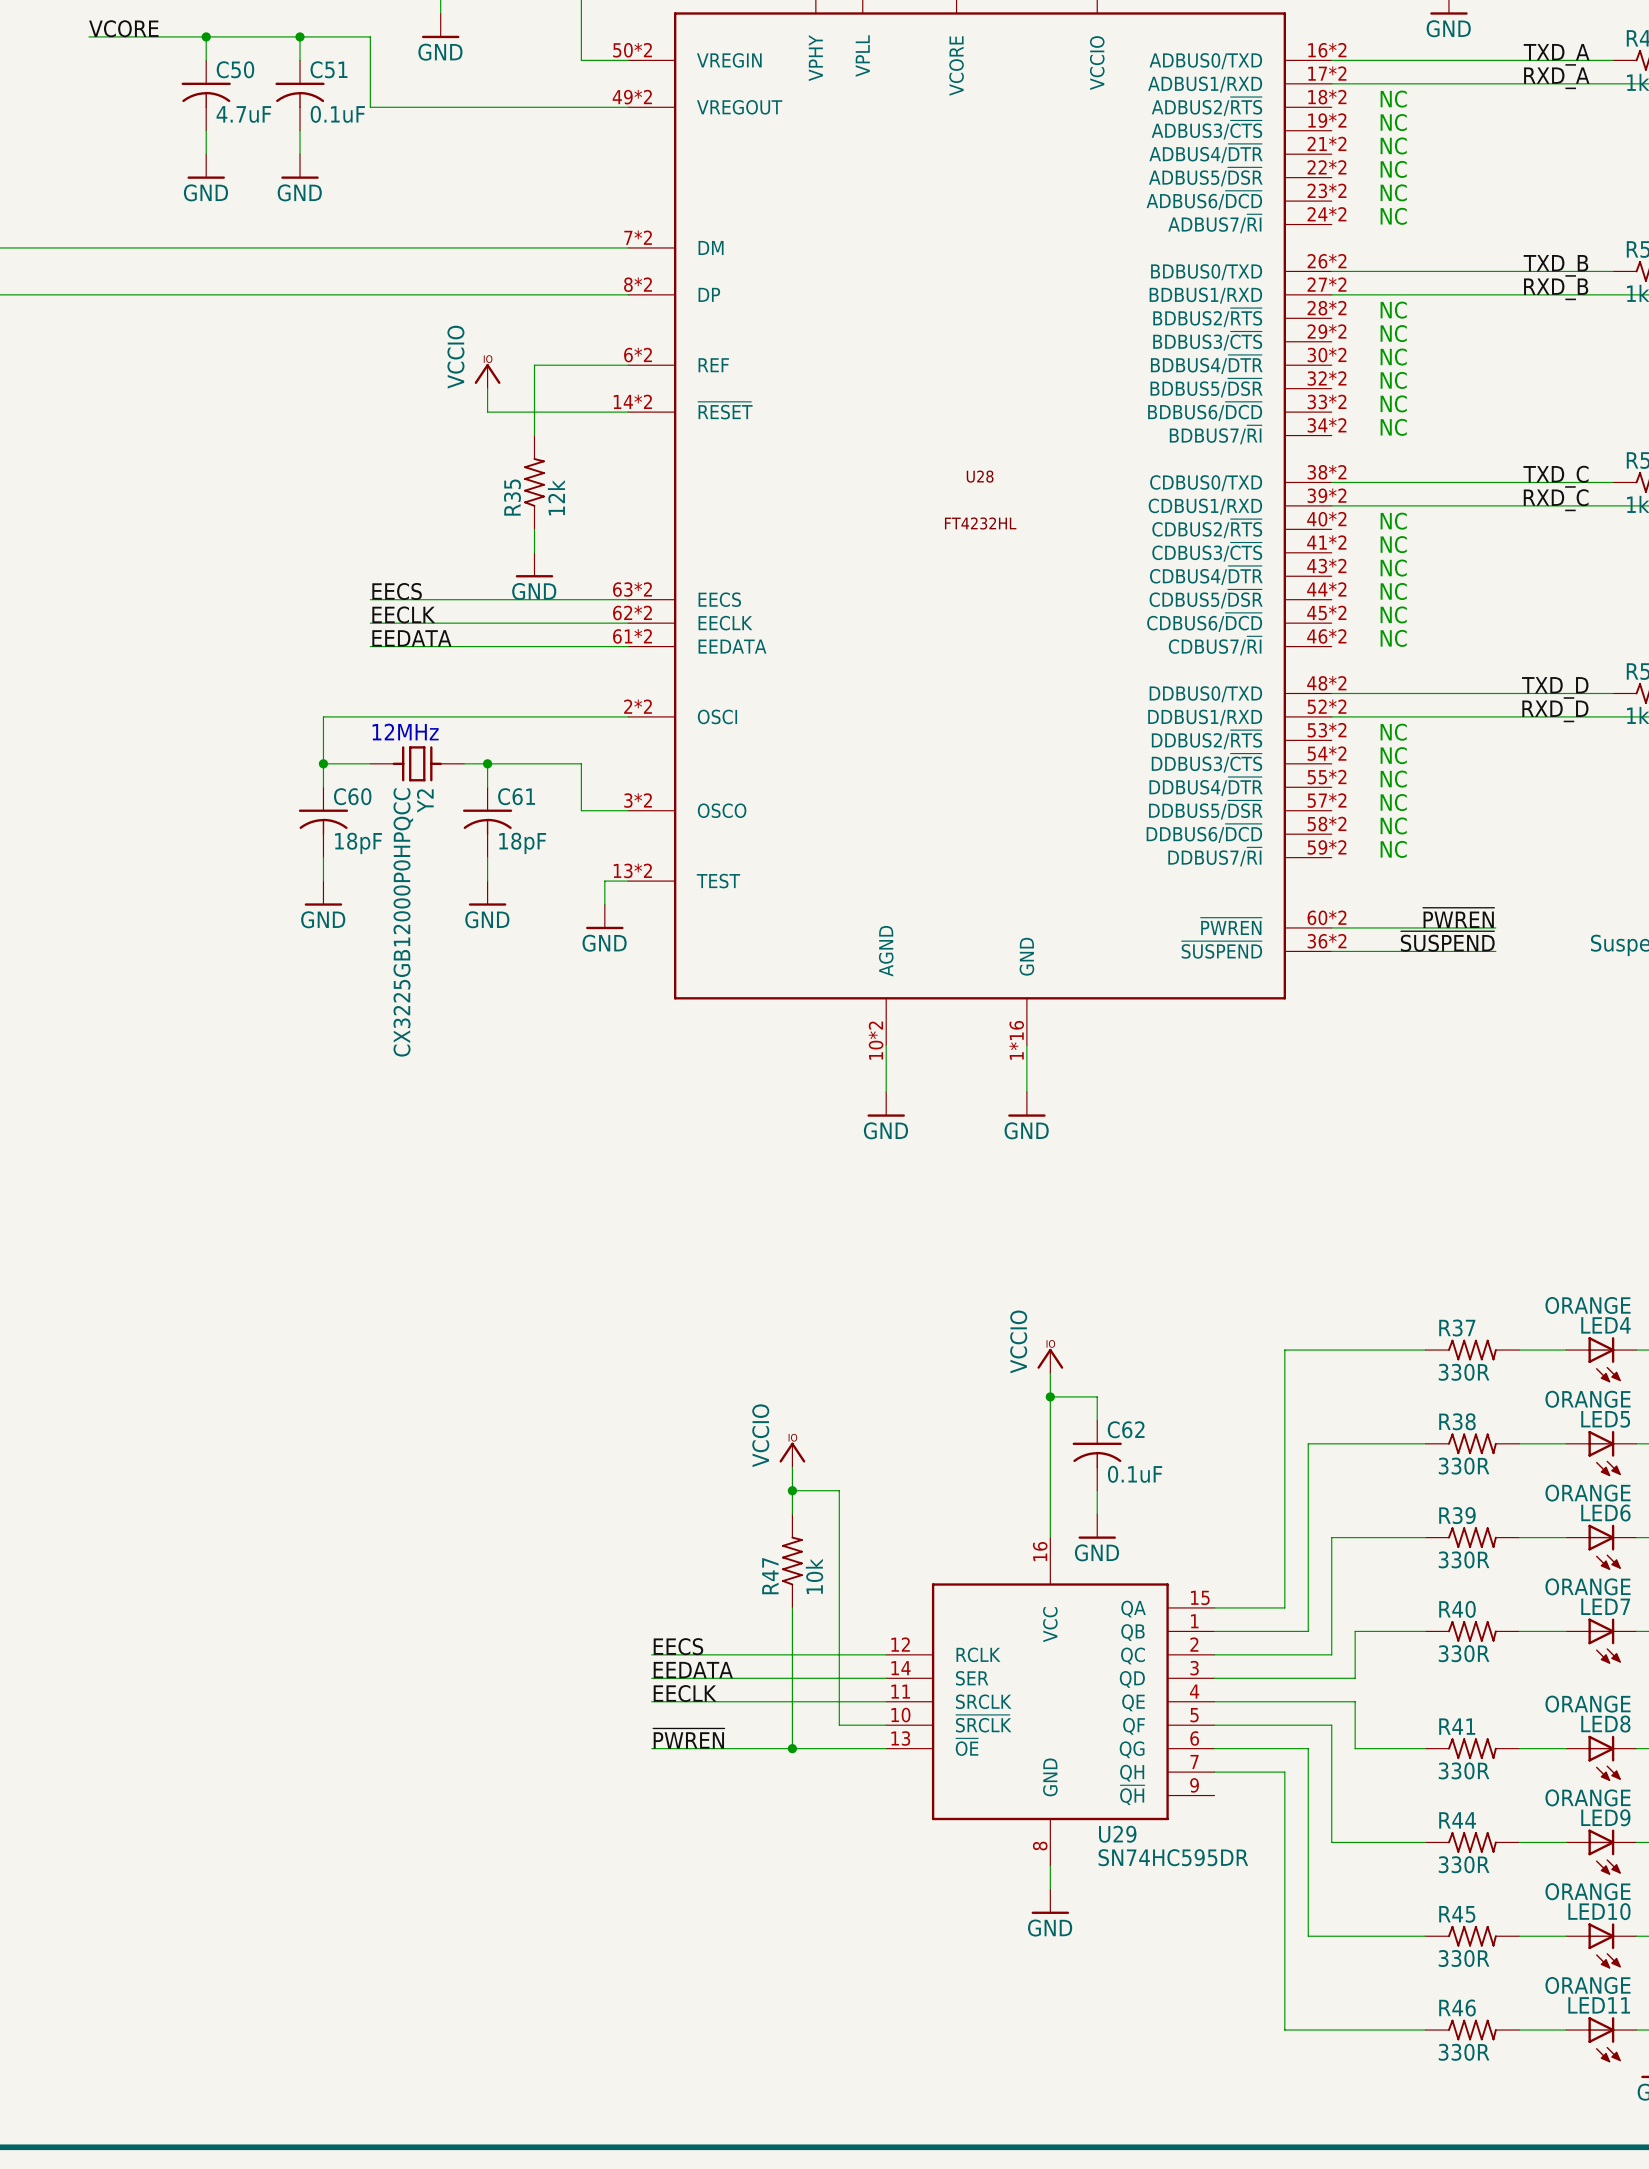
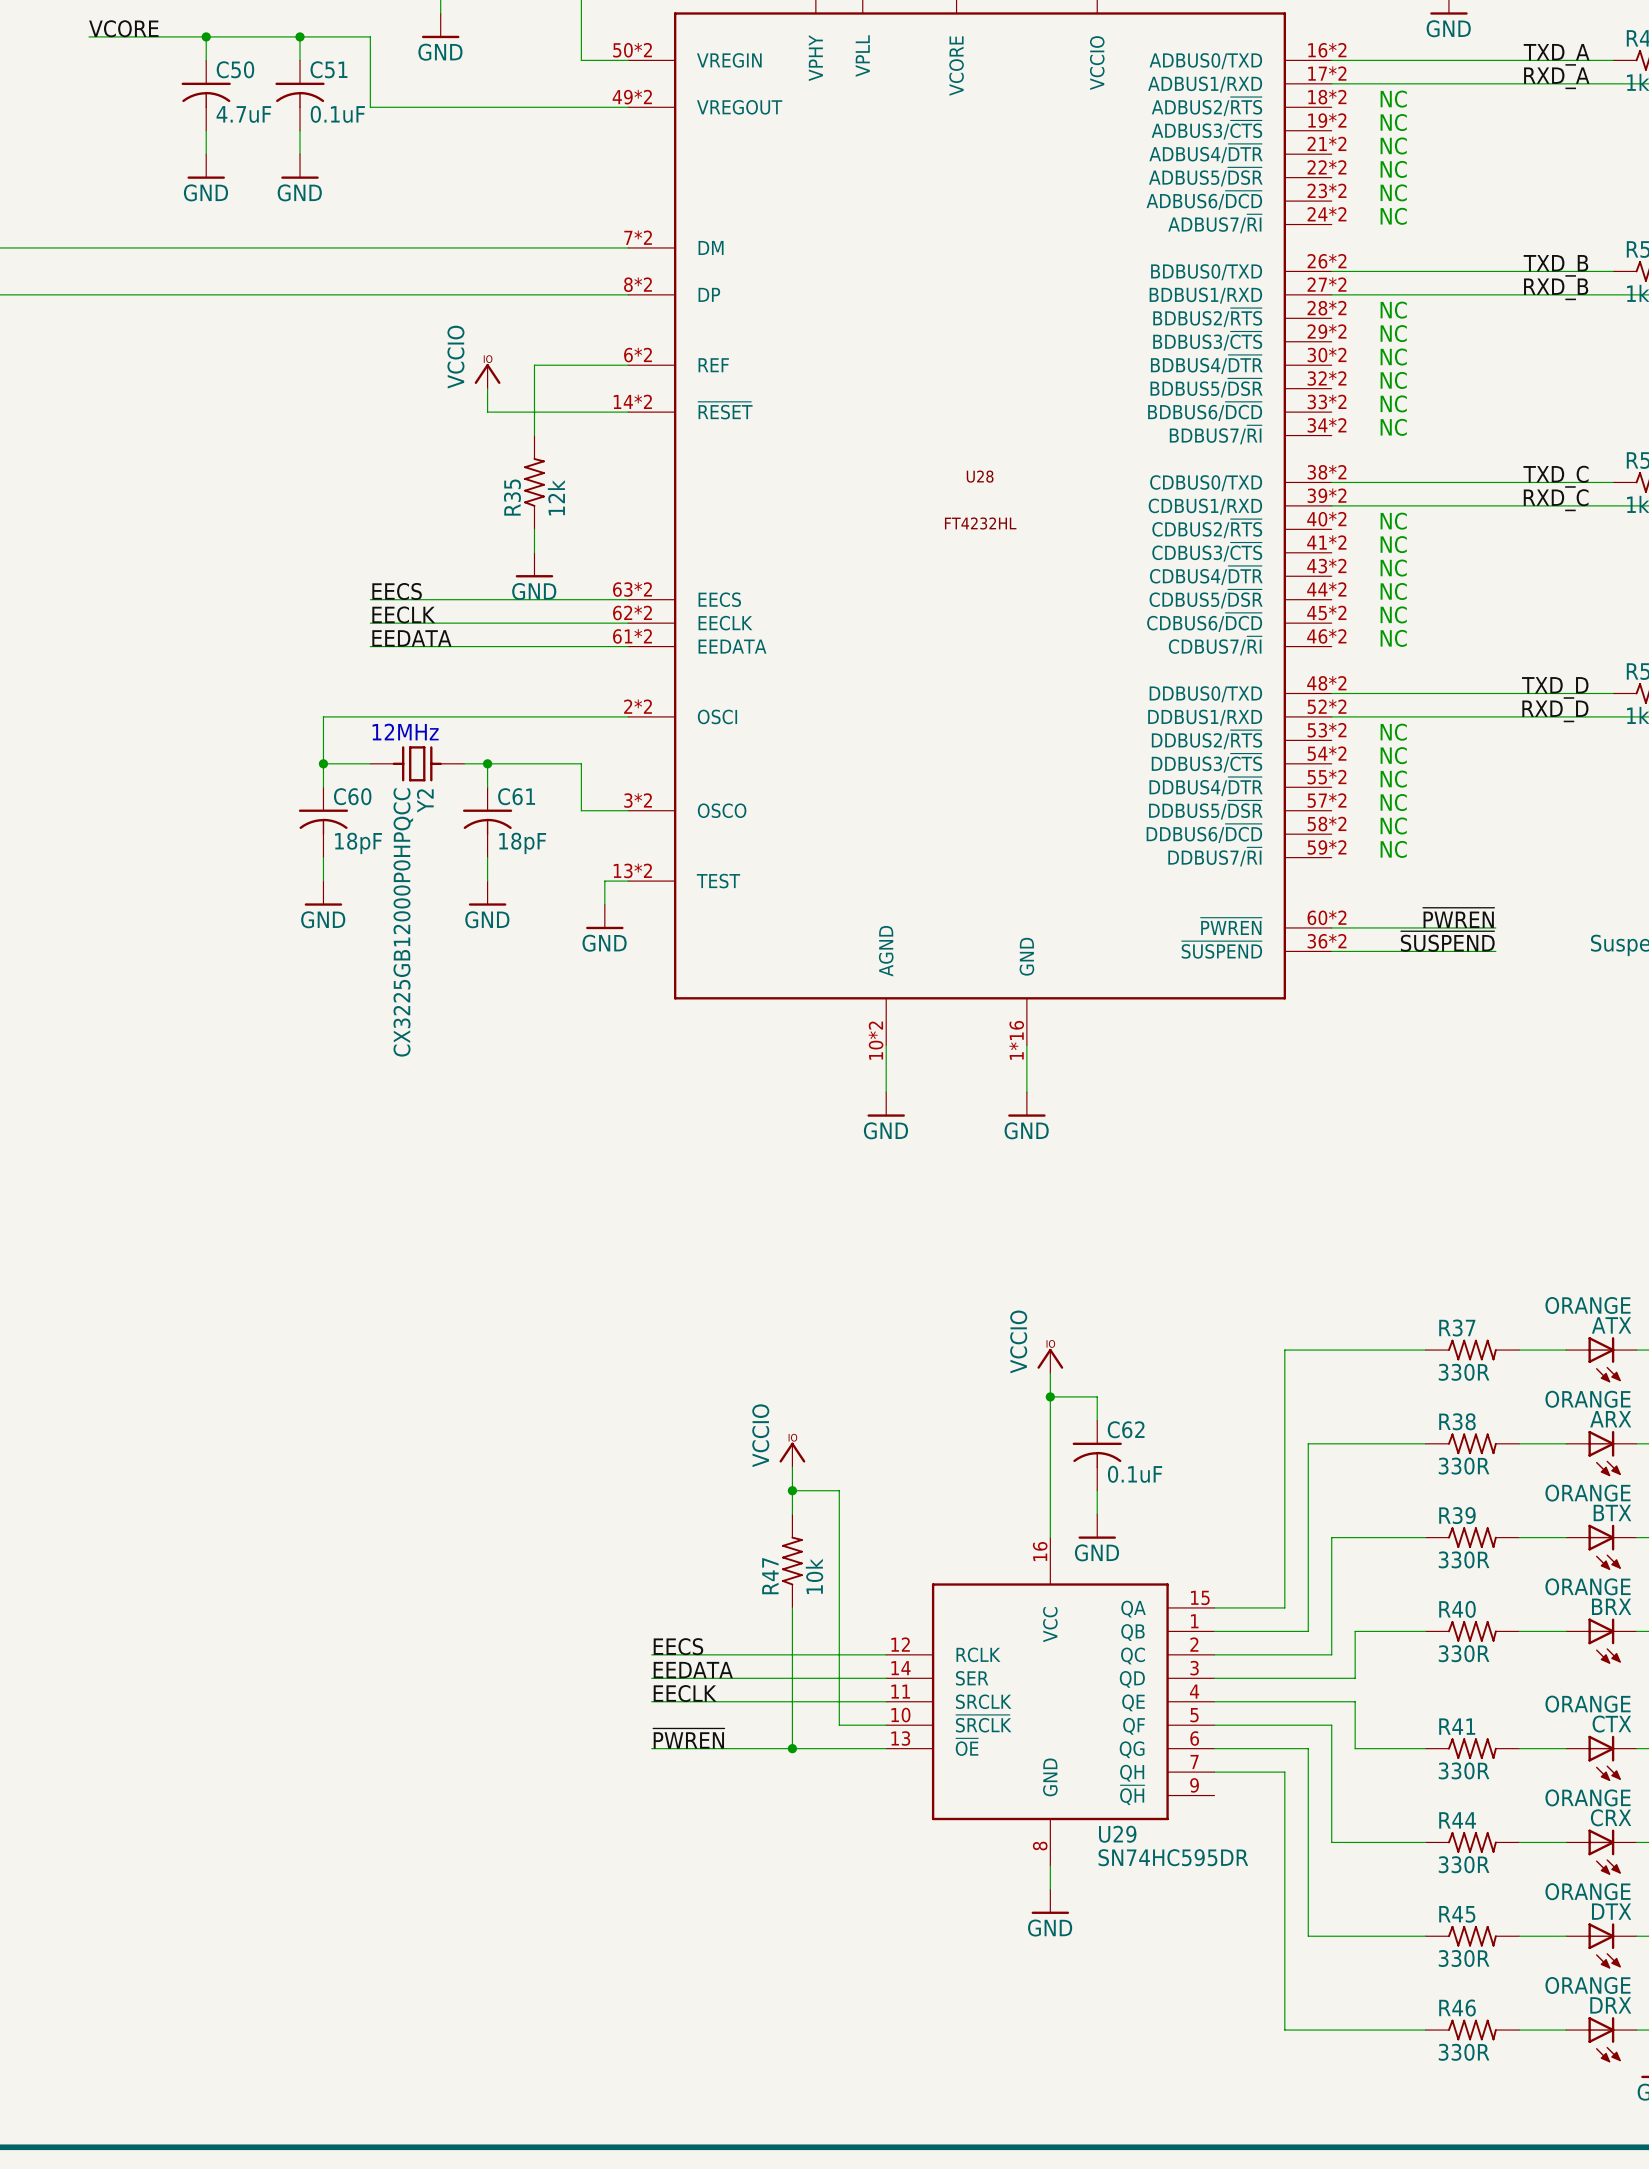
LED4 name: LED4 (1605, 1325) -> ATX (1611, 1325)
LED5 name: LED5 (1605, 1419) -> ARX (1610, 1419)
LED6 name: LED6 (1605, 1513) -> BTX (1612, 1512)
LED7 name: LED7 (1605, 1606) -> BRX (1611, 1606)
LED8 name: LED8 (1605, 1724) -> CTX (1611, 1724)
LED9 name: LED9 (1605, 1817) -> CRX (1611, 1817)
LED10 name: LED10 (1599, 1911) -> DTX (1611, 1911)
LED11 name: LED11 (1599, 2005) -> DRX (1610, 2005)

